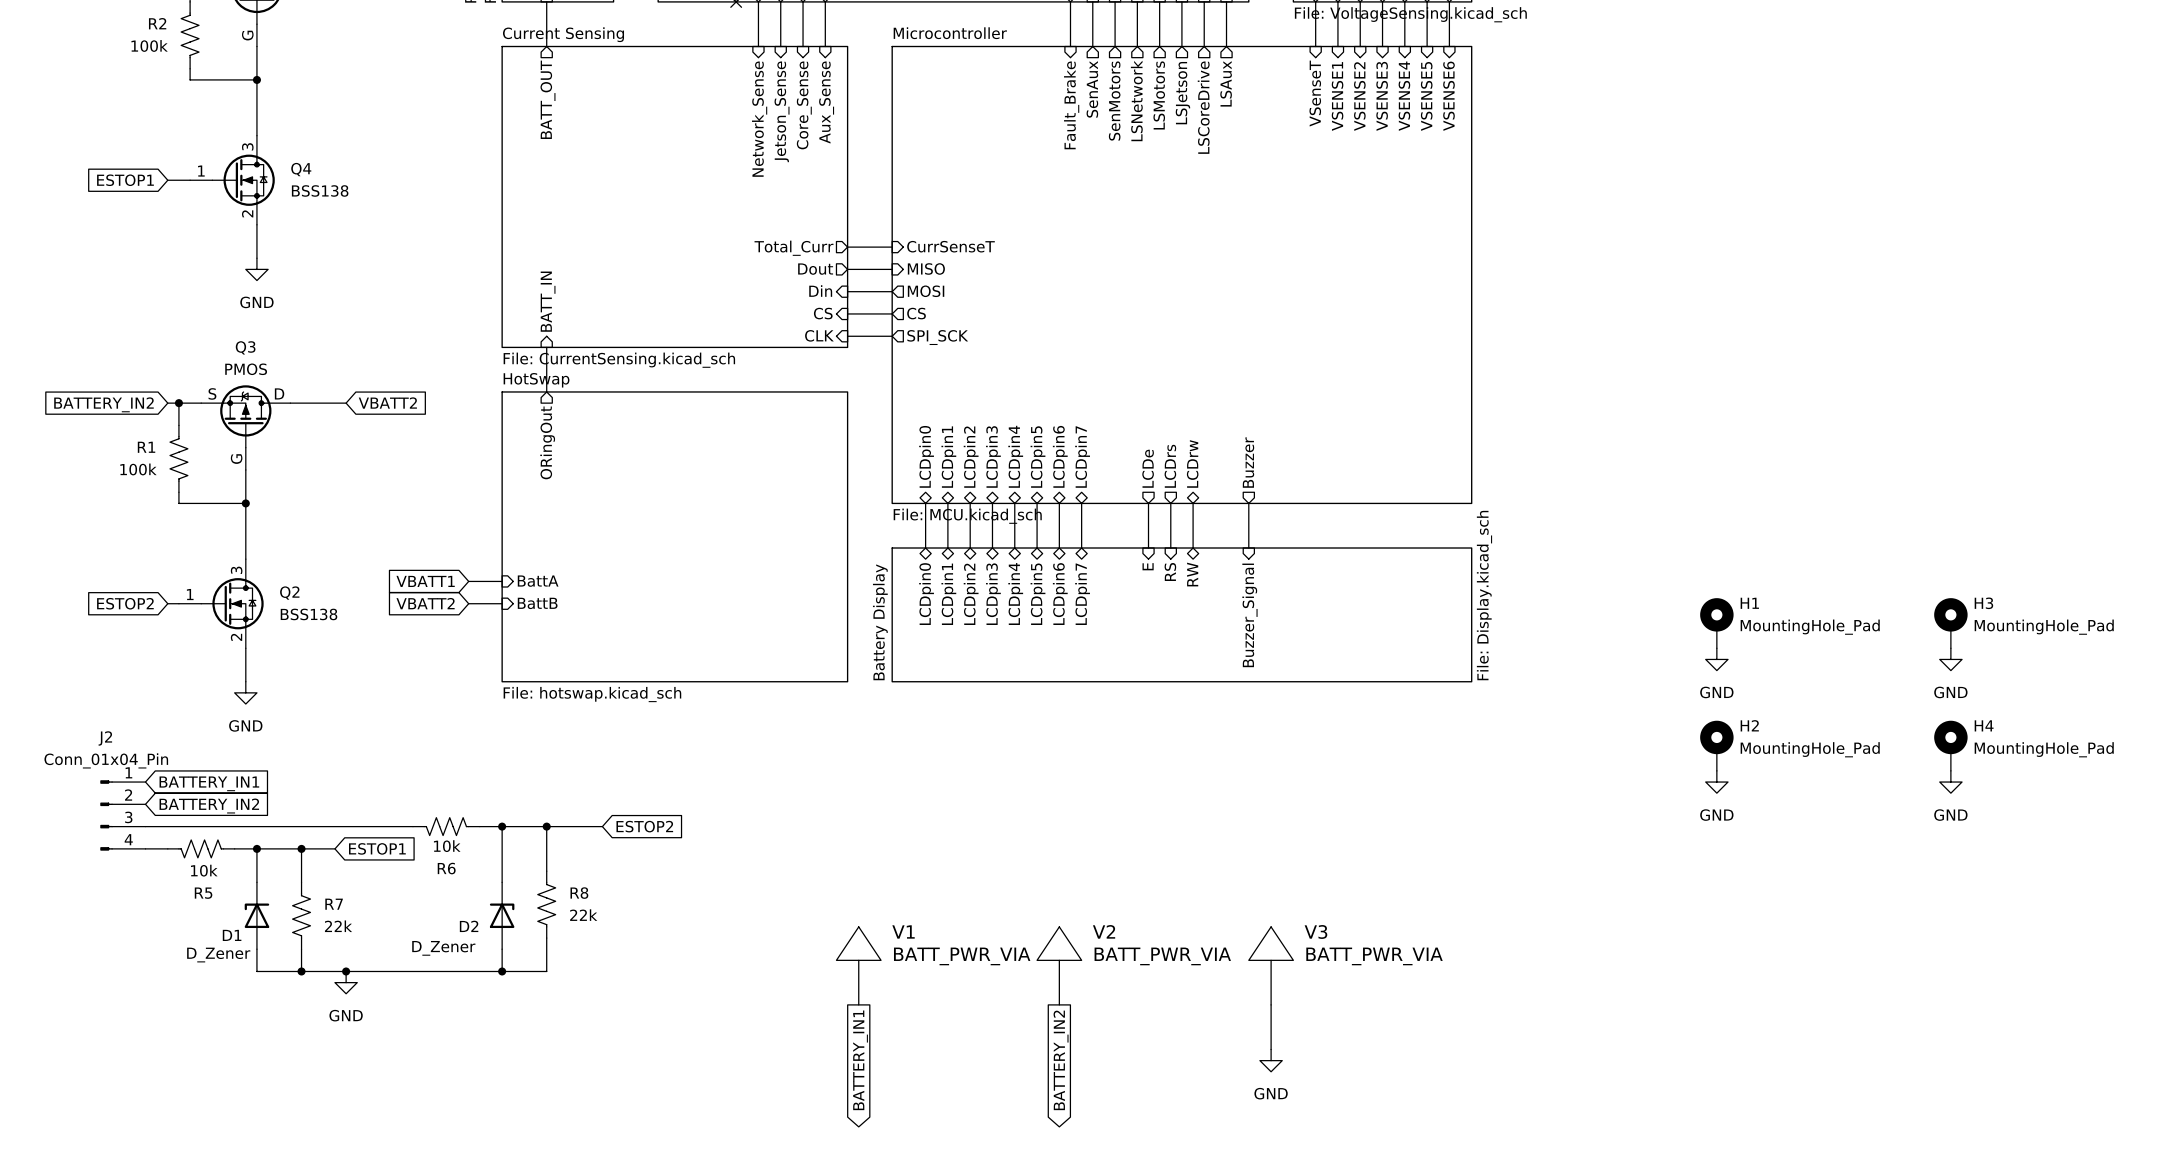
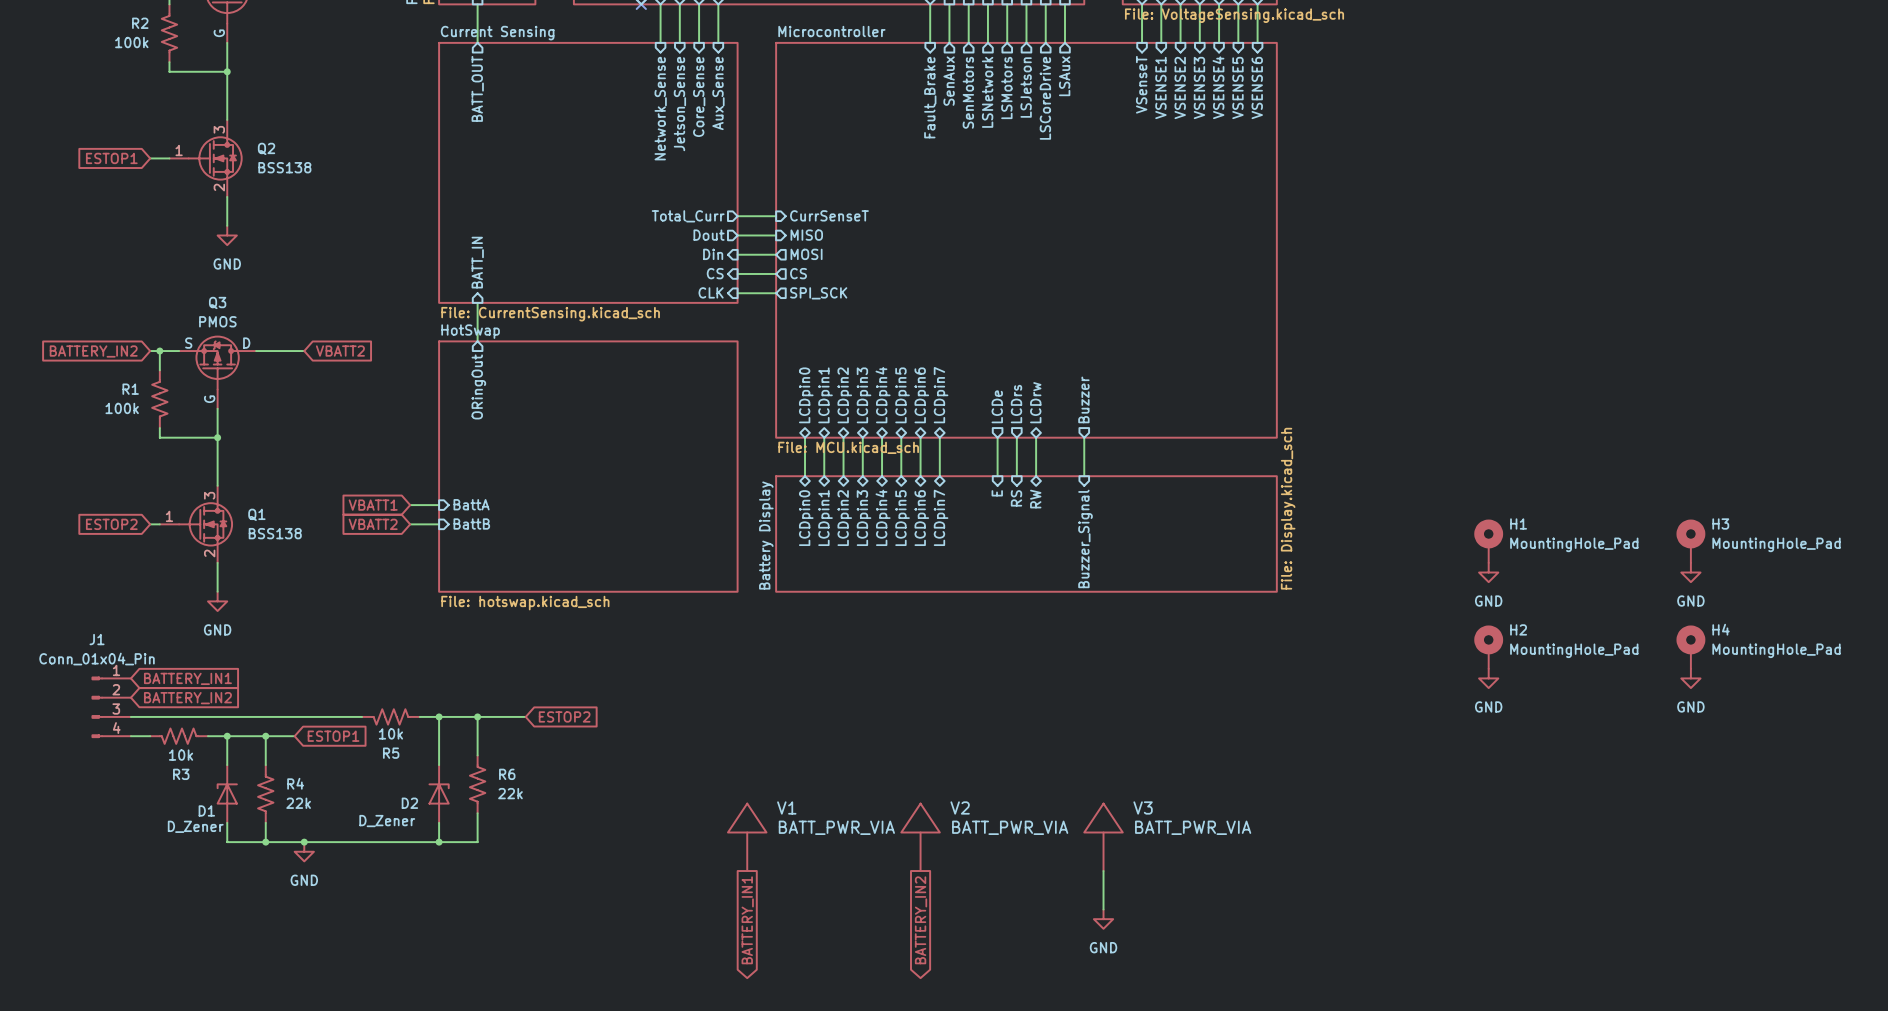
Q4 name: Q4 (301, 169) -> Q2 (266, 148)
Q2 name: Q2 (289, 593) -> Q1 (256, 514)
J2 name: J2 (105, 738) -> J1 (97, 639)
R6 name: R6 (446, 868) -> R5 (391, 753)
R5 name: R5 (203, 893) -> R3 (181, 774)
R8 name: R8 (579, 893) -> R6 (507, 774)
R7 name: R7 (334, 904) -> R4 (295, 783)

